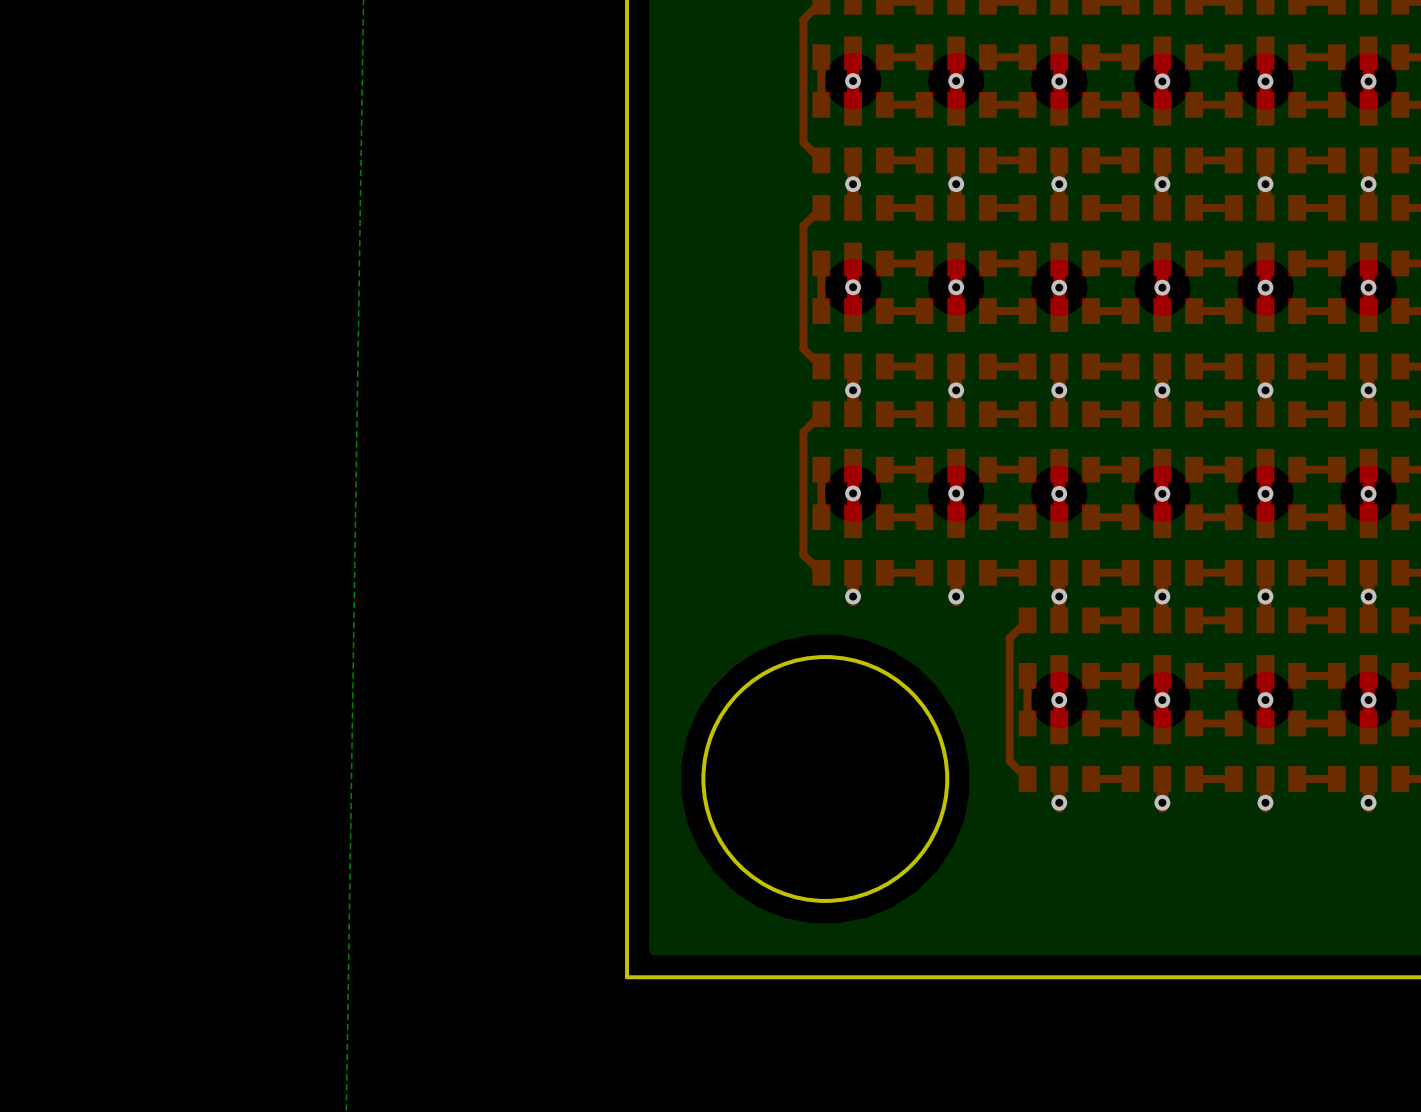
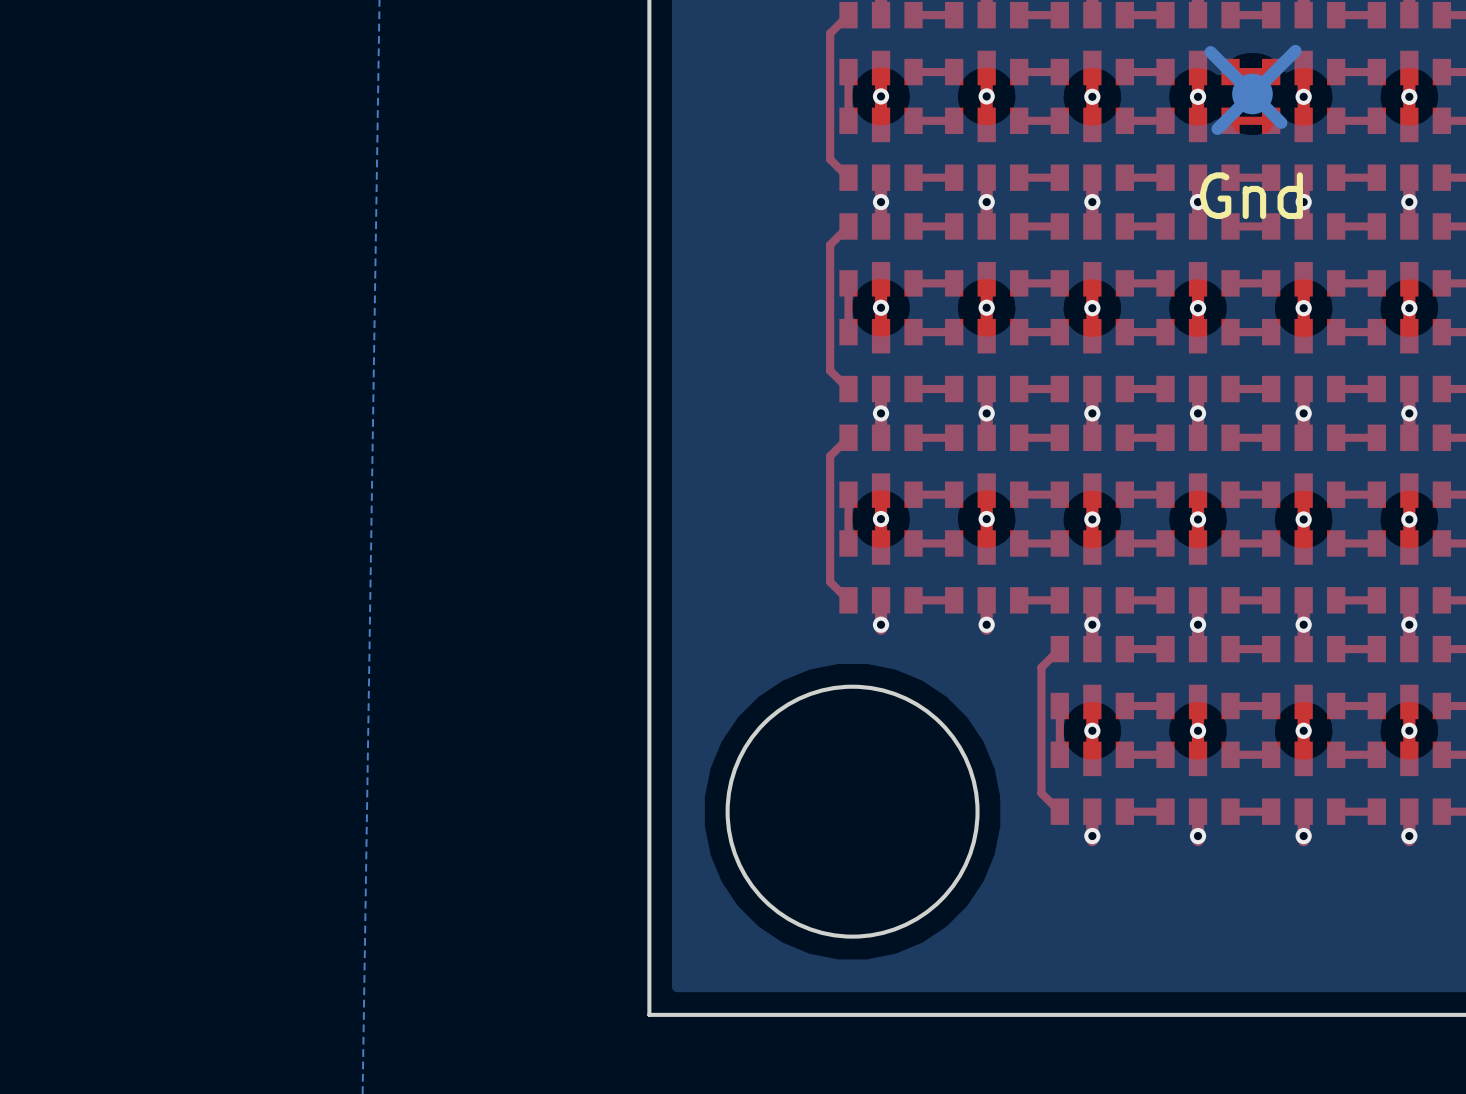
bottom track: none -> (1295, 50) (1217, 128)
bottom track: none -> (1210, 52) (1281, 122)
Gnd: none -> (1252, 93)

